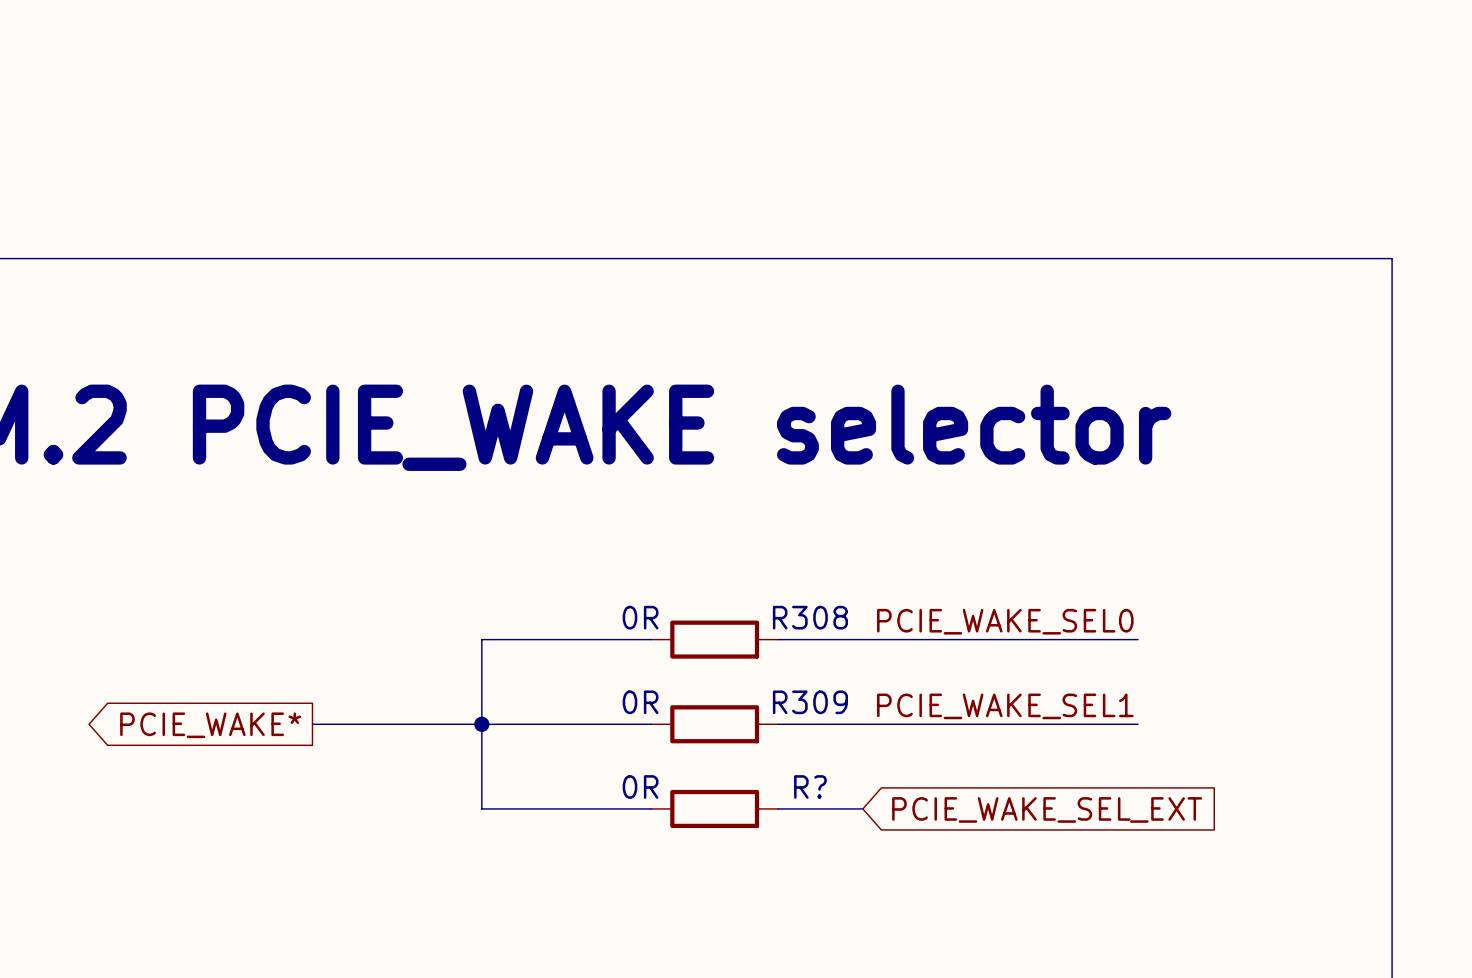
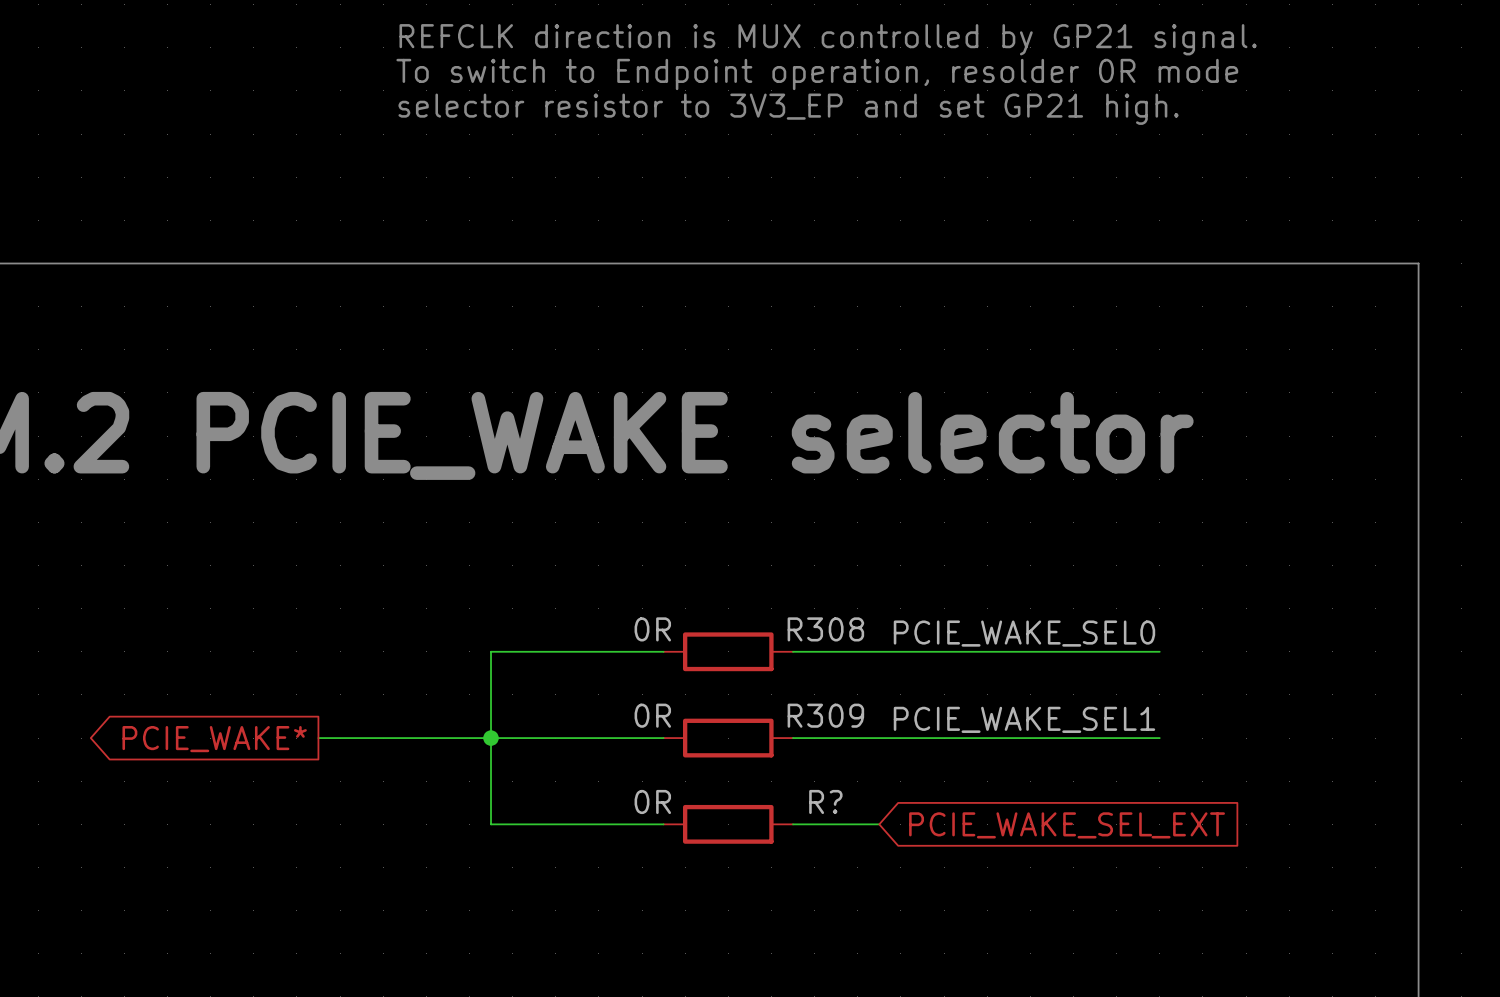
text: none -> REFCLK direction is MUX controlled by GP21 signal. (828, 39)
text: none -> To switch to Endpoint operation, resolder 0R mode (817, 74)
text: none -> selector resistor to 3V3_EP and set GP21 high. (788, 109)

